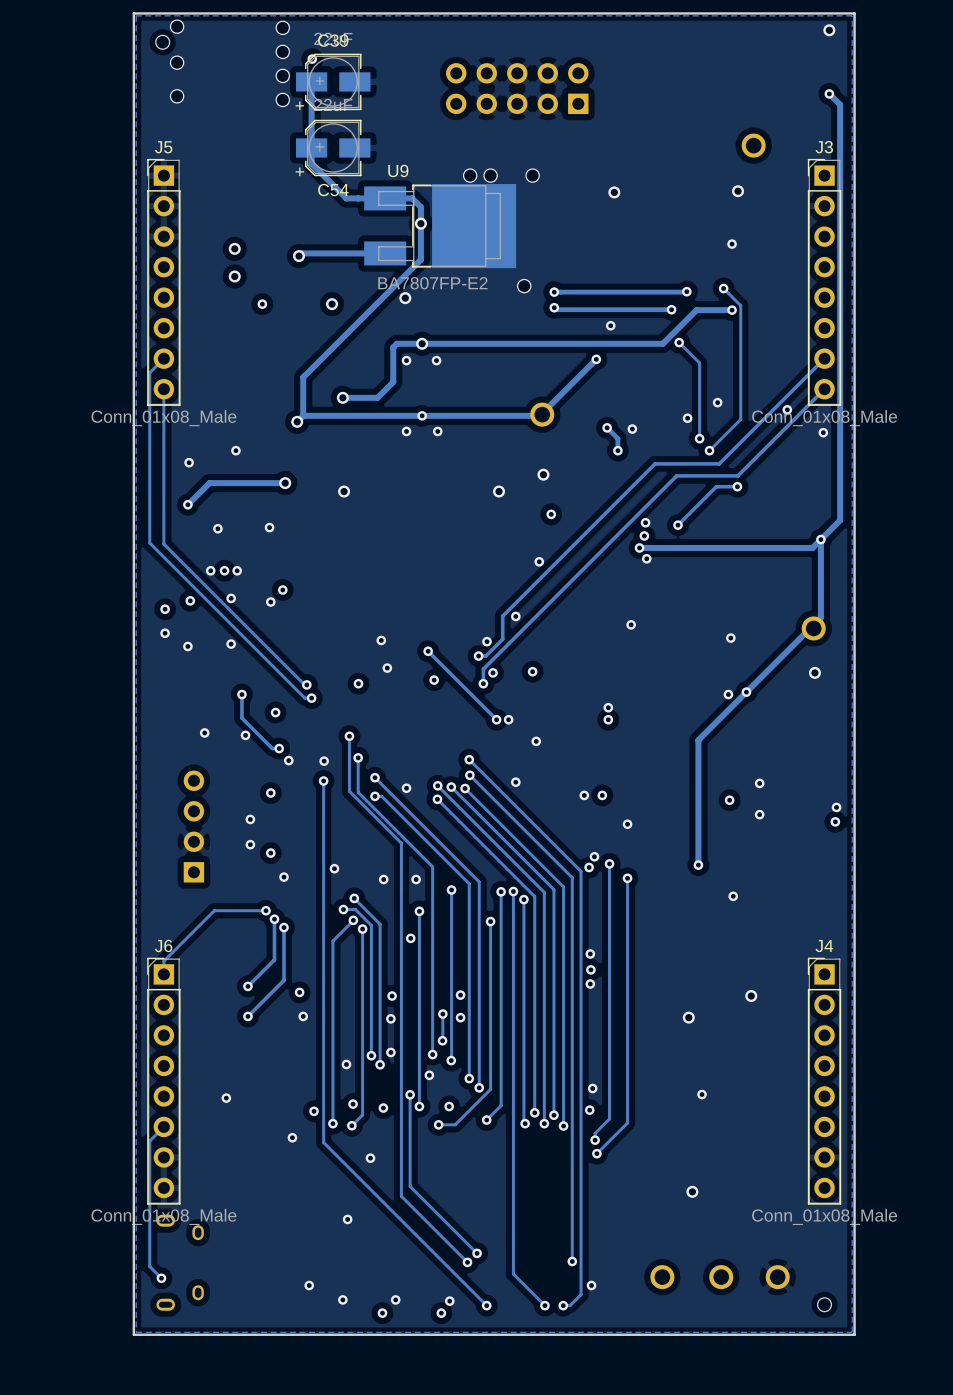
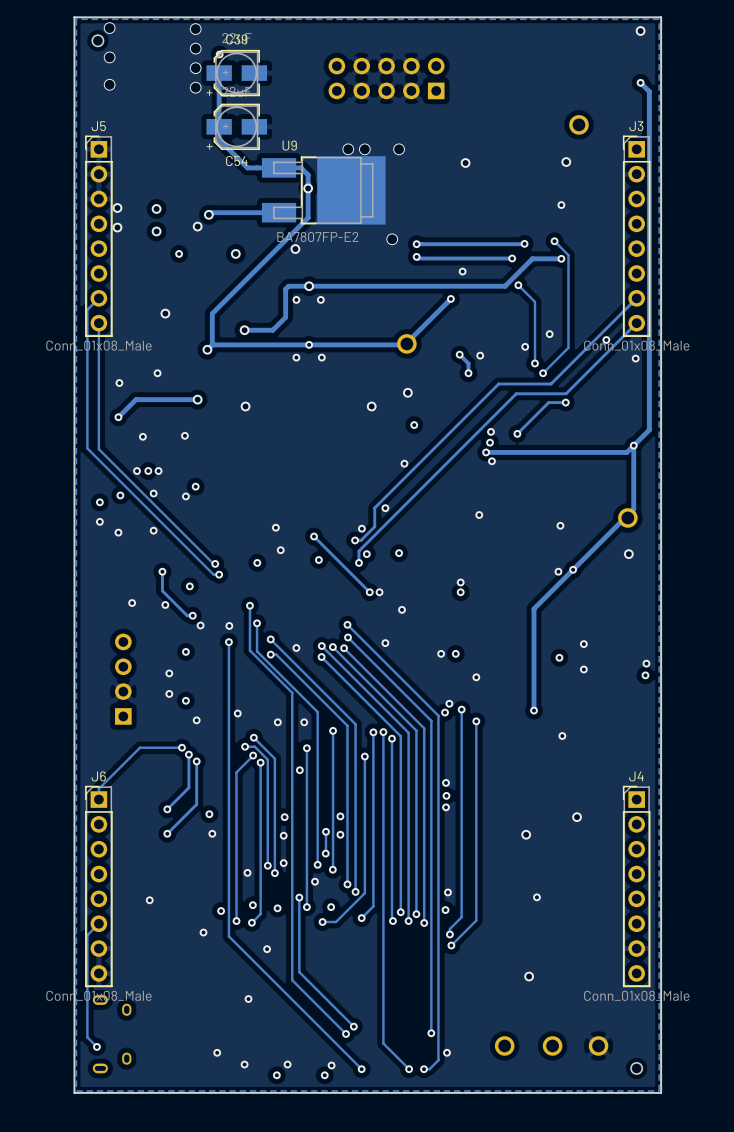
via: none -> (117, 208)
via: none -> (197, 226)
via: none -> (117, 227)
via: none -> (165, 313)

